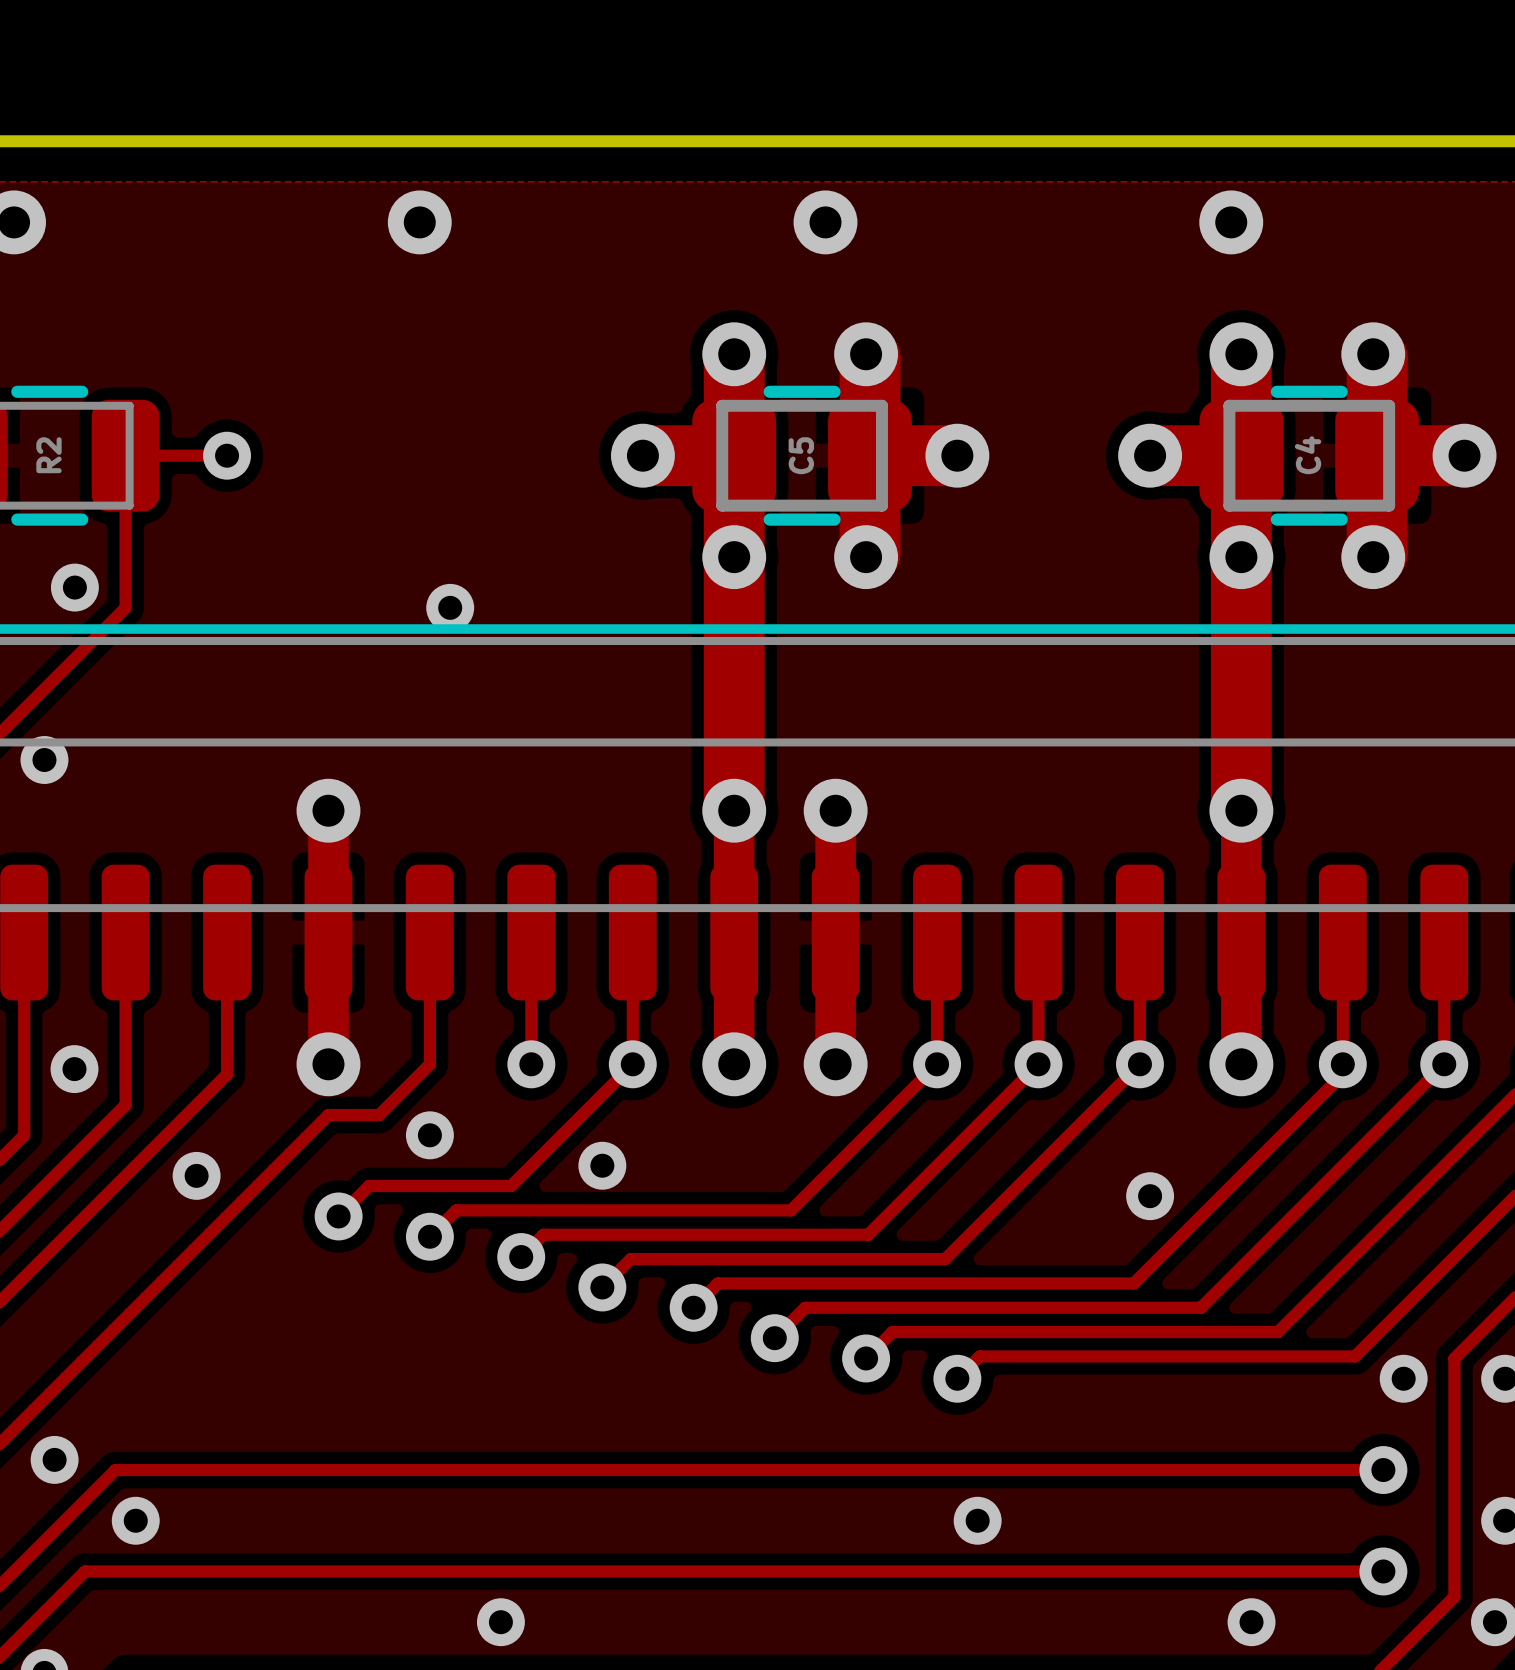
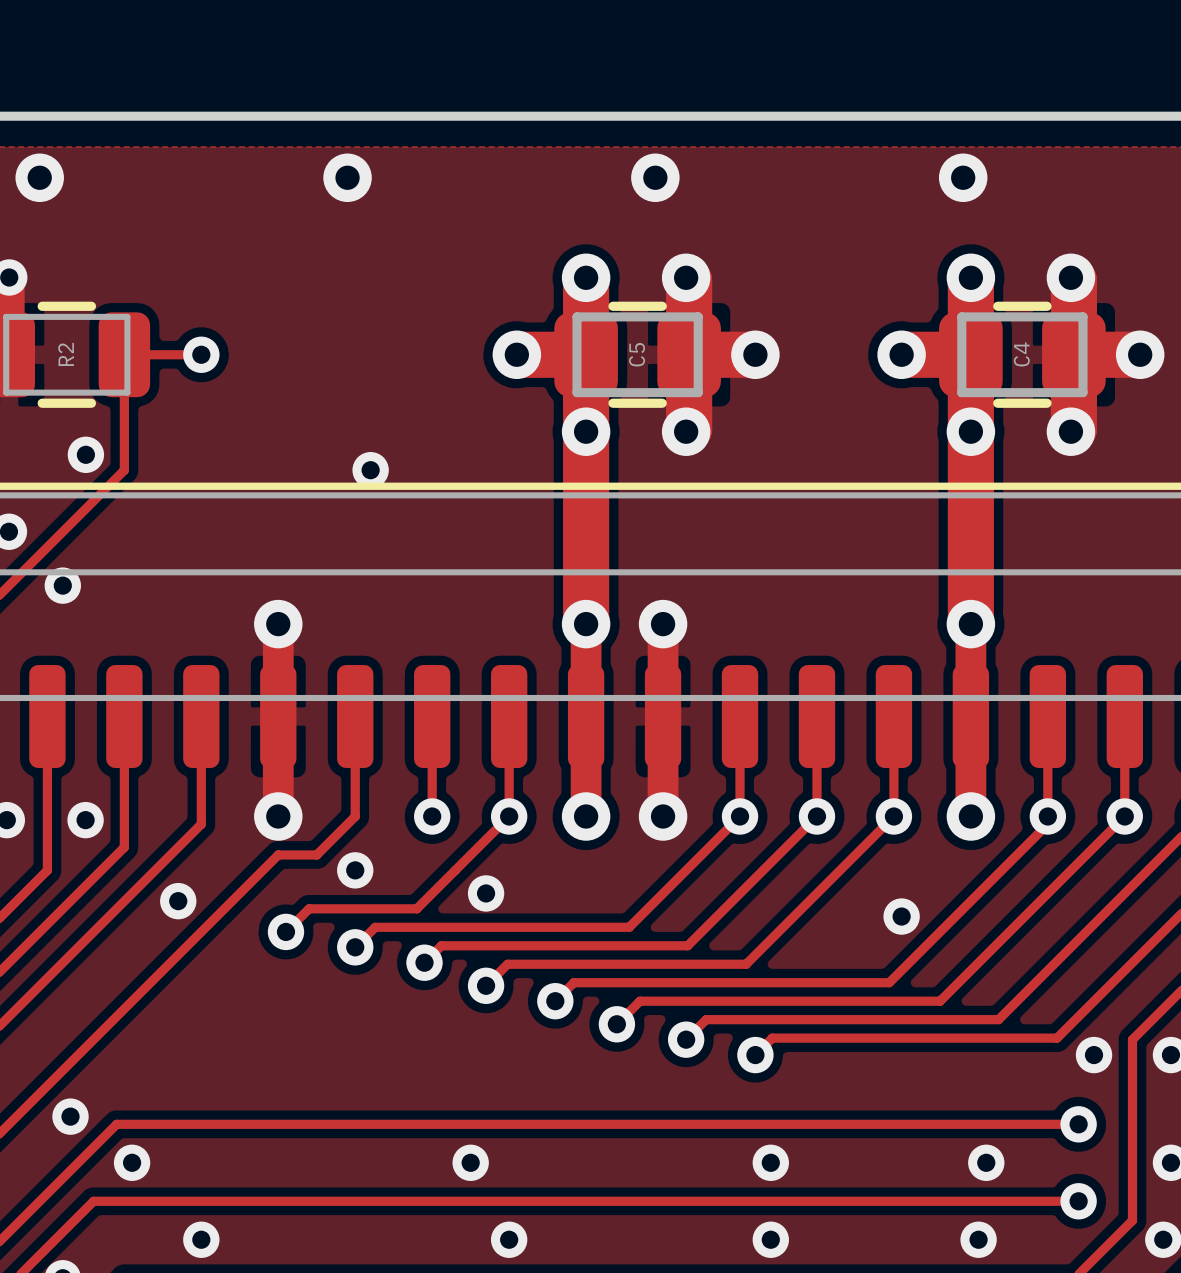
via: none -> (470, 1162)
via: none -> (986, 1162)
via: none -> (201, 1239)
via: (500, 1622) -> none
via: none -> (509, 1239)
via: none -> (770, 1239)

